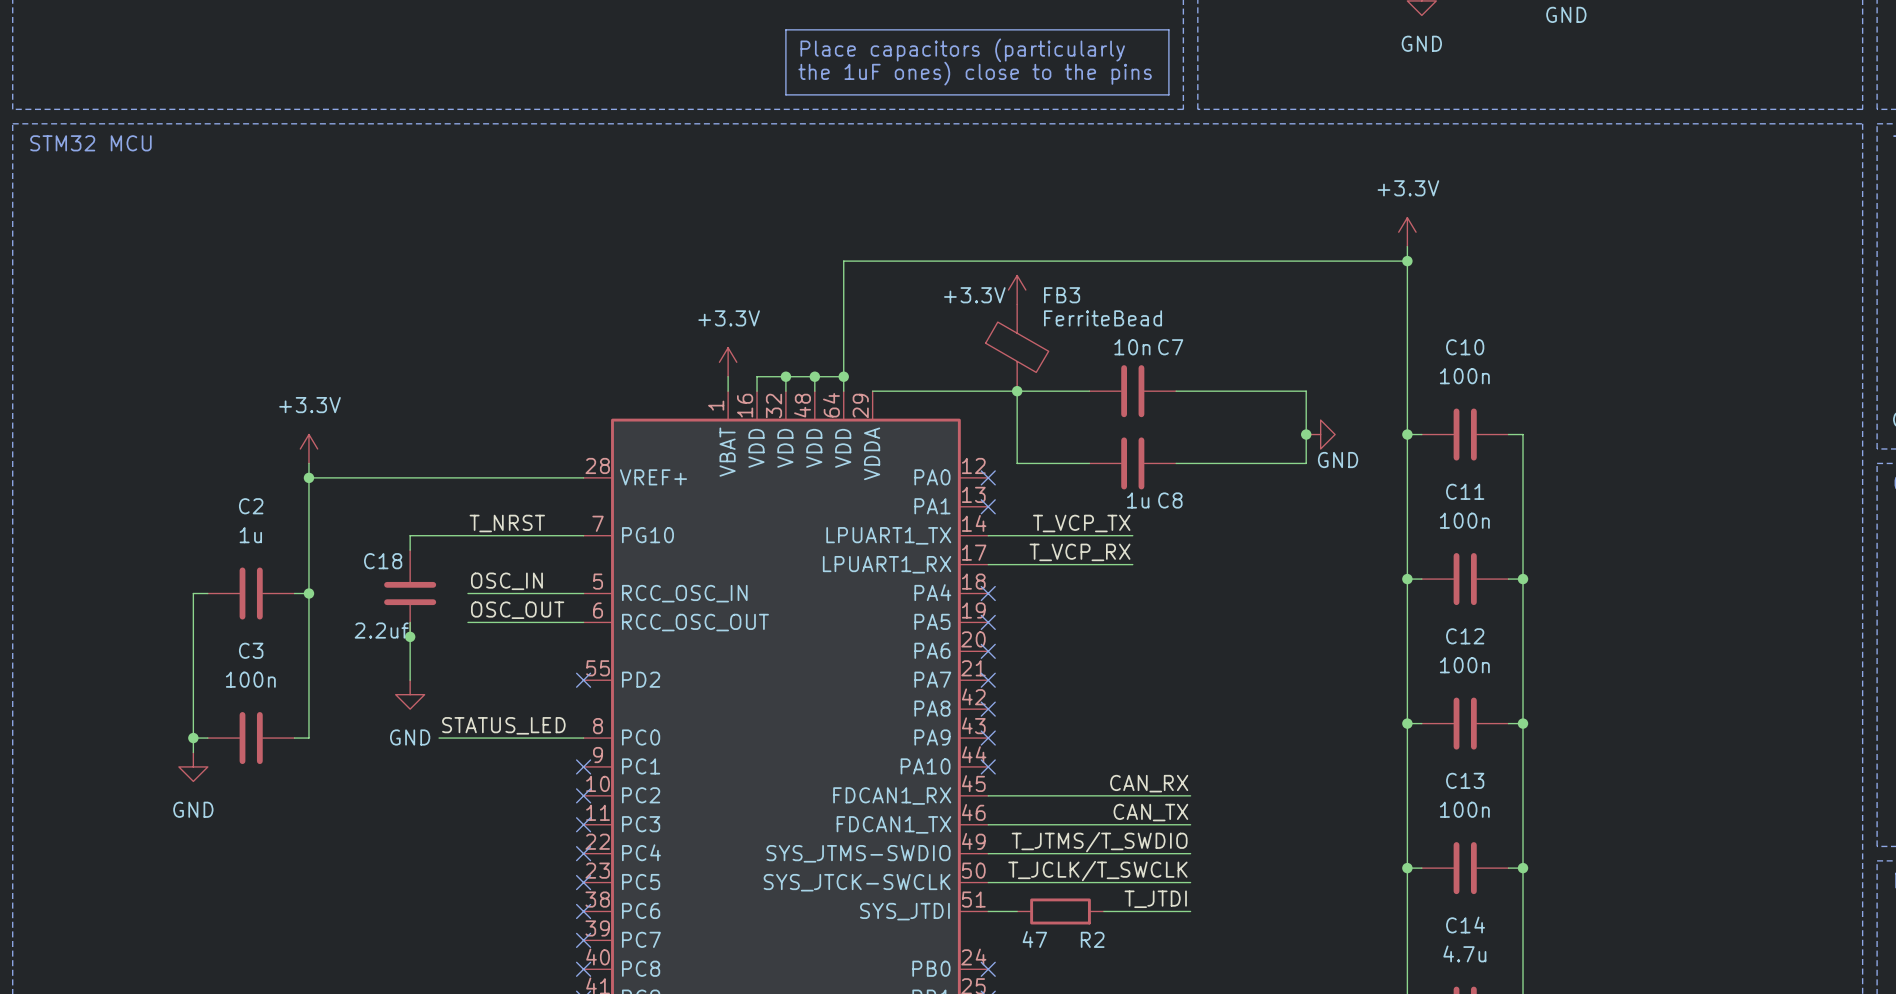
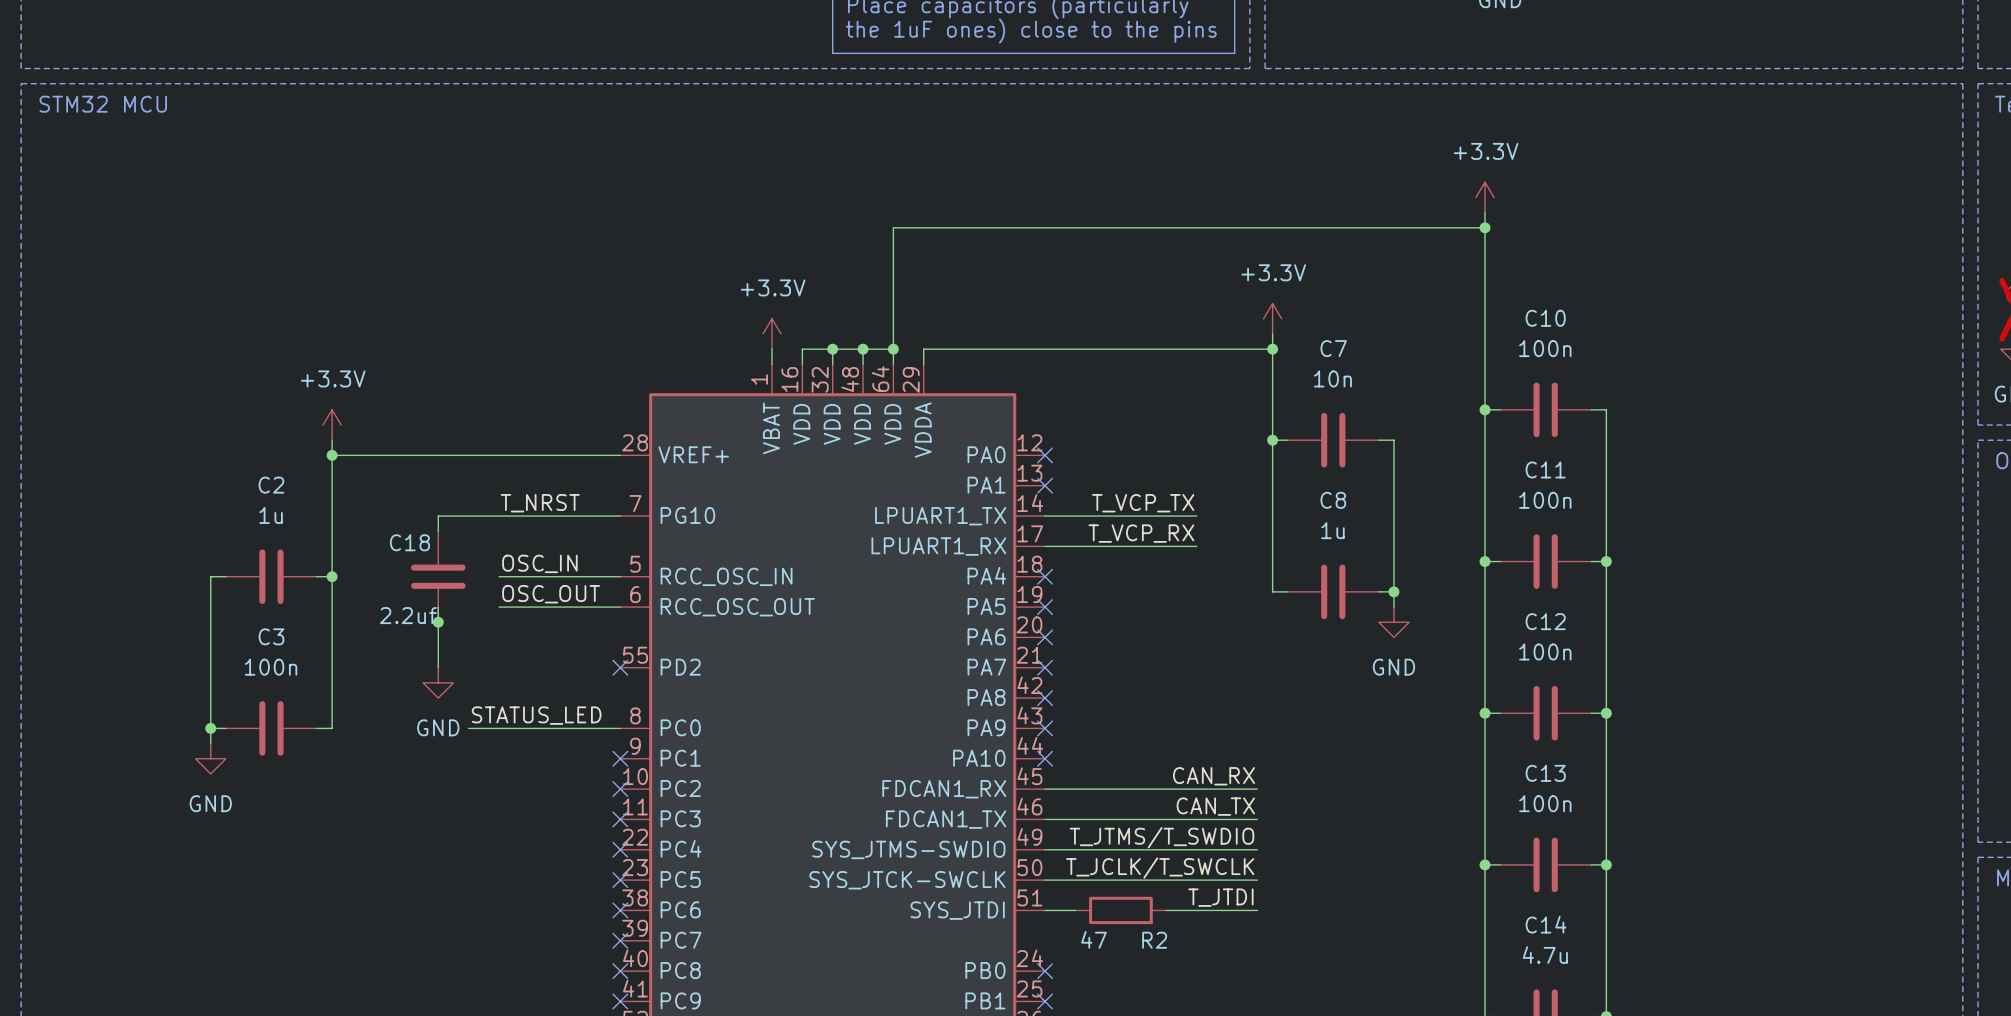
power symbol position: +3.3V (1017, 290) -> +3.3V (1272, 318)
power symbol text position: +3.3V (974, 295) -> +3.3V (1273, 272)
FB3: FerriteBead (1017, 347) -> none
C7 value position: 10n (1132, 347) -> 10n (1332, 378)
C7 name position: C7 (1170, 347) -> C7 (1333, 348)
wire: none -> (1272, 334) (1272, 591) (1287, 591)
junction: none -> (1272, 349)
wire: (872, 391) (1089, 391) -> (923, 364) (923, 349) (1272, 349)
wire: (1017, 391) (1017, 463) (1089, 463) -> none
junction: (1017, 391) -> none
C7 position: (1132, 391) -> (1333, 440)
wire: (1176, 391) (1306, 391) (1306, 463) (1219, 463) -> none
junction: (1306, 434) -> none
power symbol rotation: 0° (1320, 434) -> 90° clockwise (1393, 622)
power symbol position: GND (1320, 434) -> GND (1393, 622)
power symbol text position: GND (1338, 460) -> GND (1393, 667)
C8 position: (1132, 463) -> (1333, 591)
wire: (1176, 463) (1205, 463) -> none
junction: none -> (1272, 440)
wire: none -> (1378, 440) (1393, 440) (1393, 607)
C8 value position: 1u (1138, 500) -> 1u (1332, 530)
C8 name position: C8 (1170, 500) -> C8 (1333, 500)
wire: none -> (1378, 591) (1393, 591)
junction: none -> (1393, 591)

